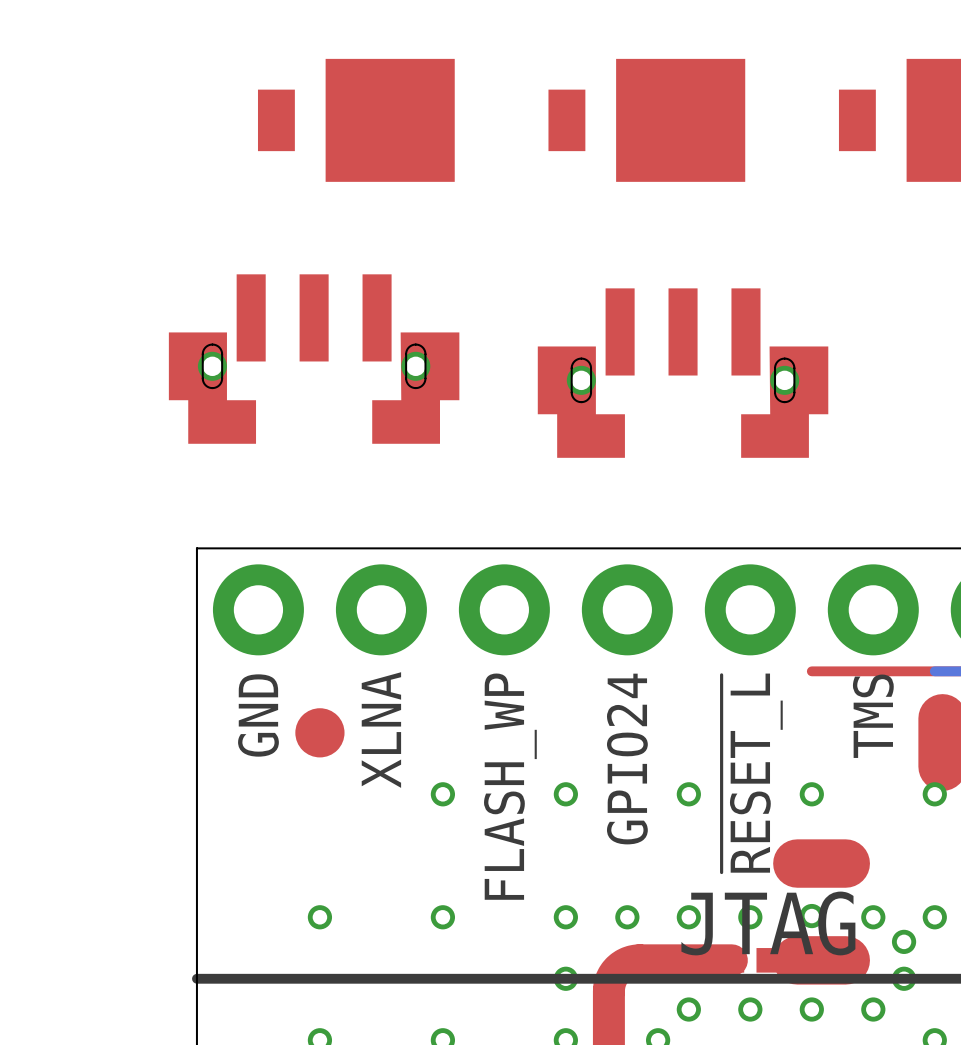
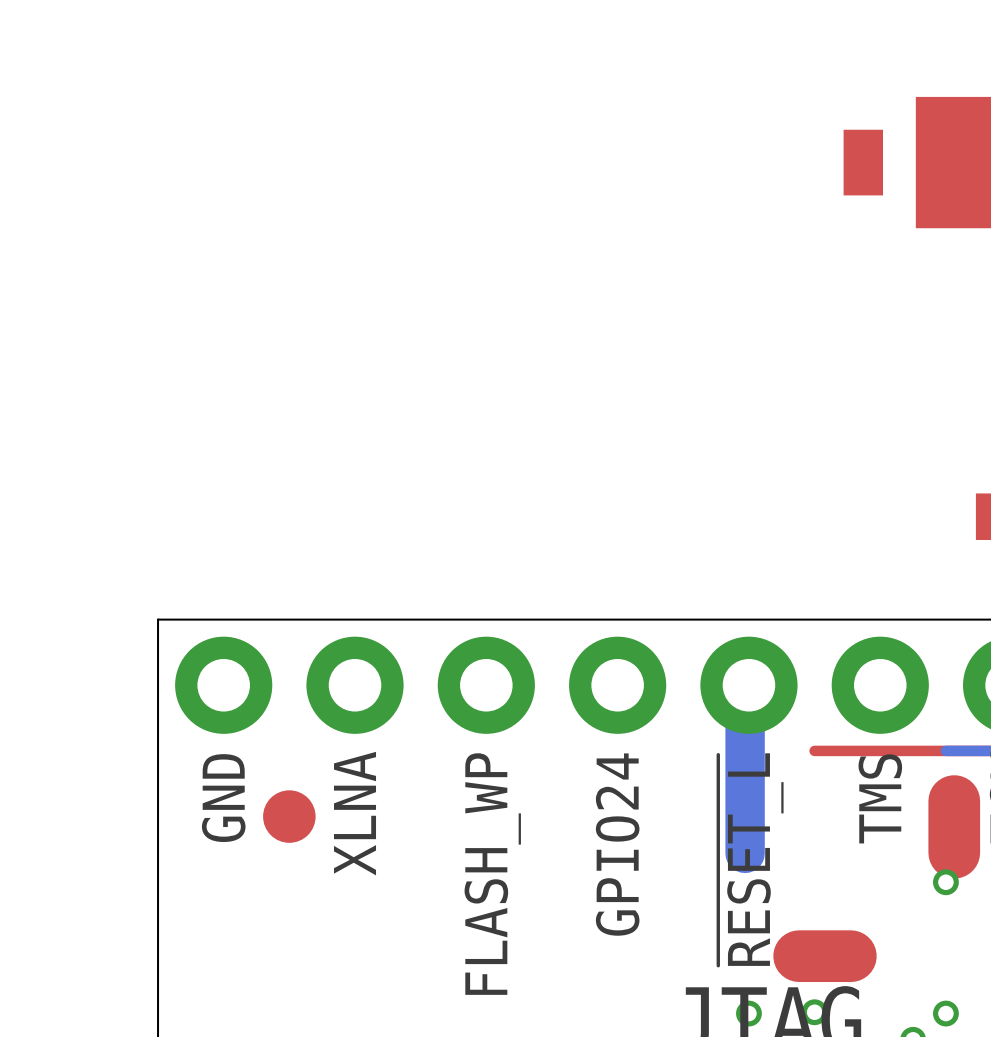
part: (356, 120) -> none
part: (646, 120) -> none
part: (314, 359) -> none
part: (683, 373) -> none
bottom track: none -> (748, 685) (745, 689) (745, 853)
via: (442, 794) -> none
via: (565, 794) -> none
via: (688, 794) -> none
via: (811, 794) -> none
via: (319, 917) -> none
via: (442, 917) -> none
via: (565, 917) -> none
via: (627, 917) -> none
via: (688, 917) -> none
via: (873, 917) -> none

